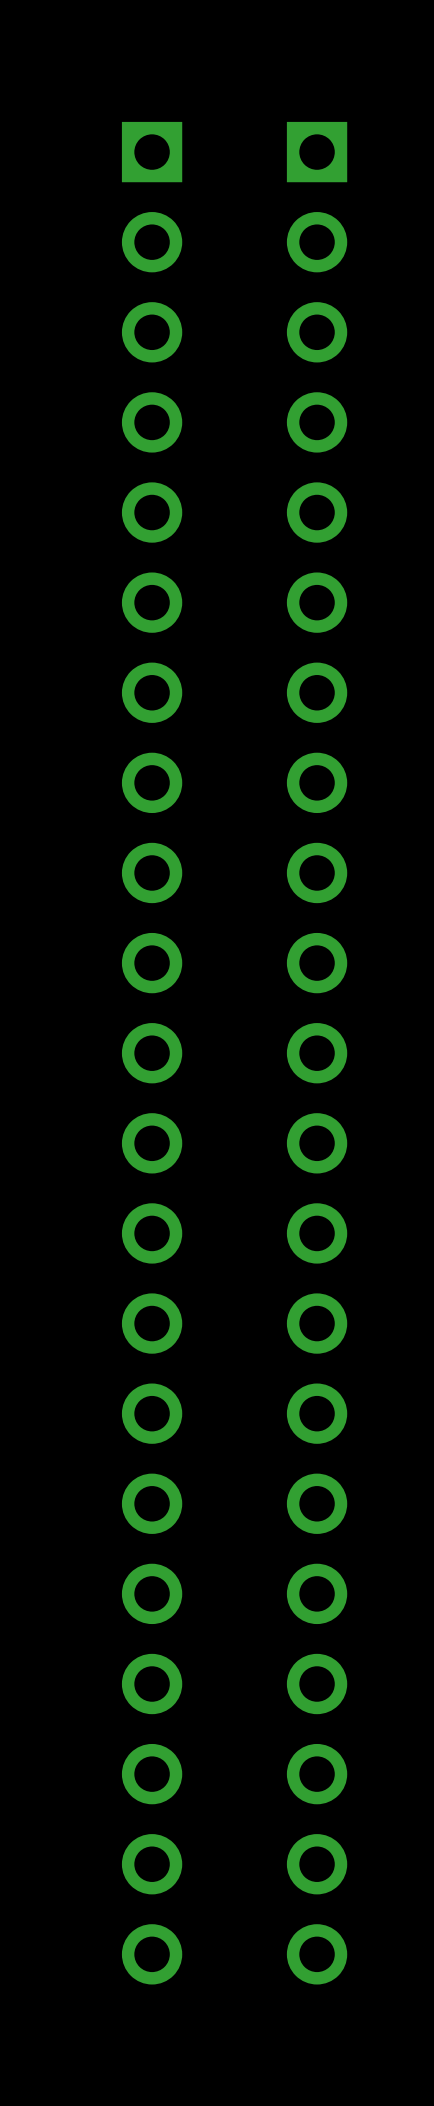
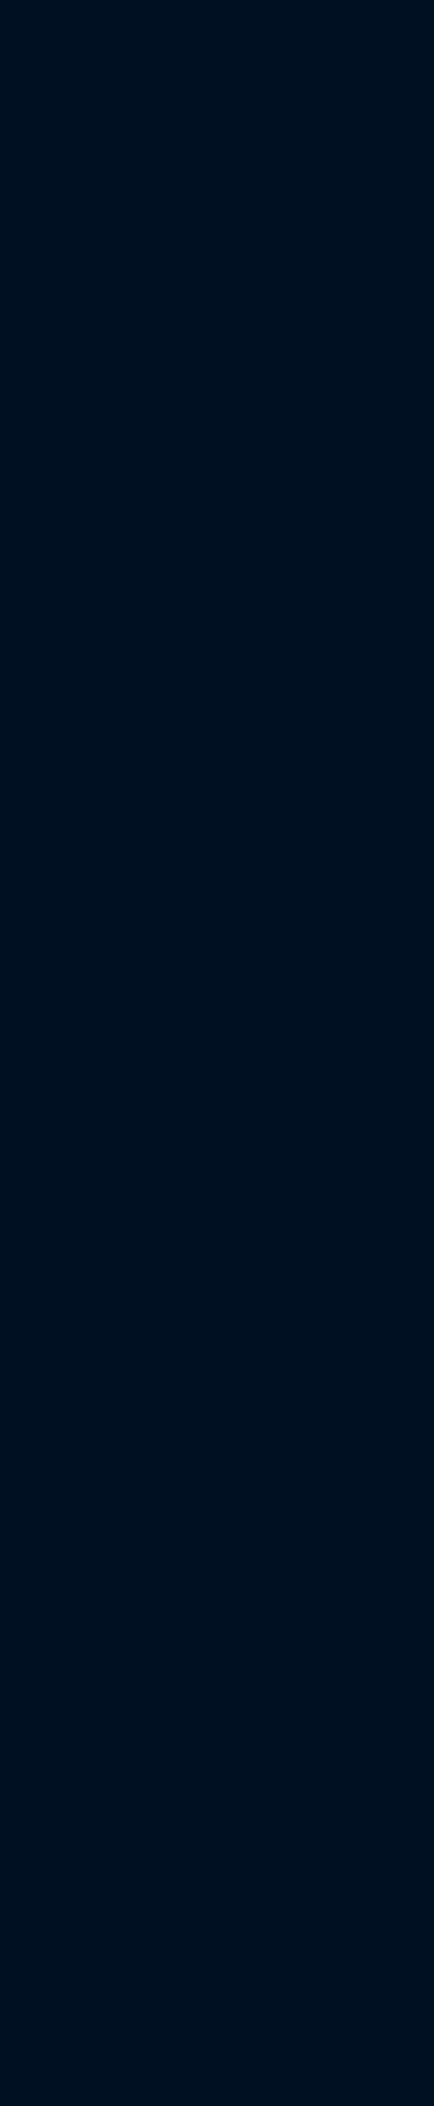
part: (152, 1053) -> none
part: (317, 1053) -> none

